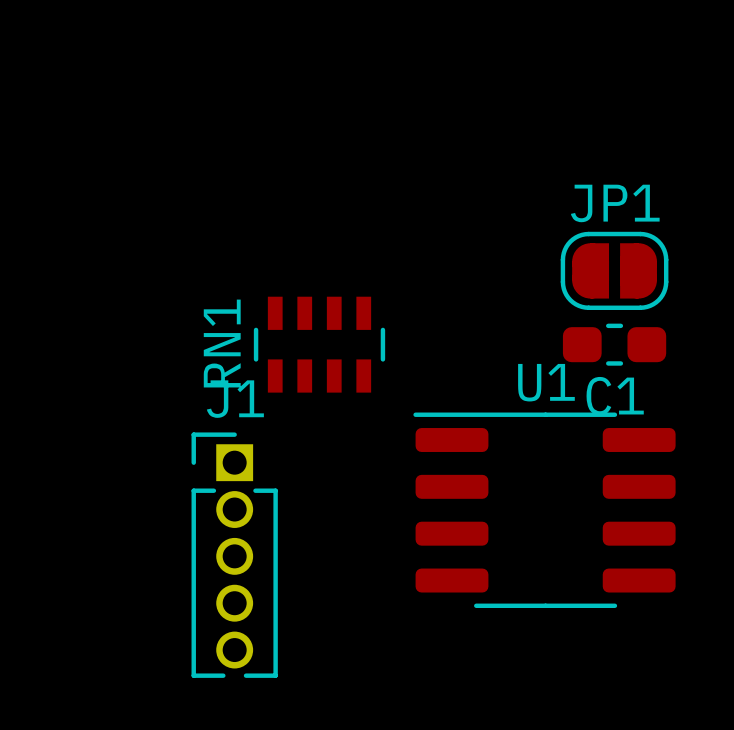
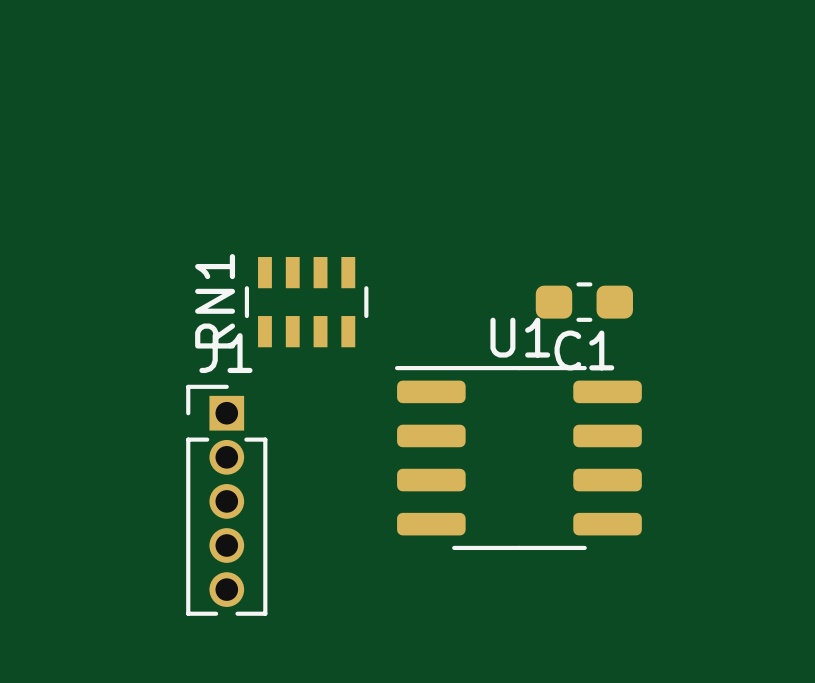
JP1: (614, 270) -> none

